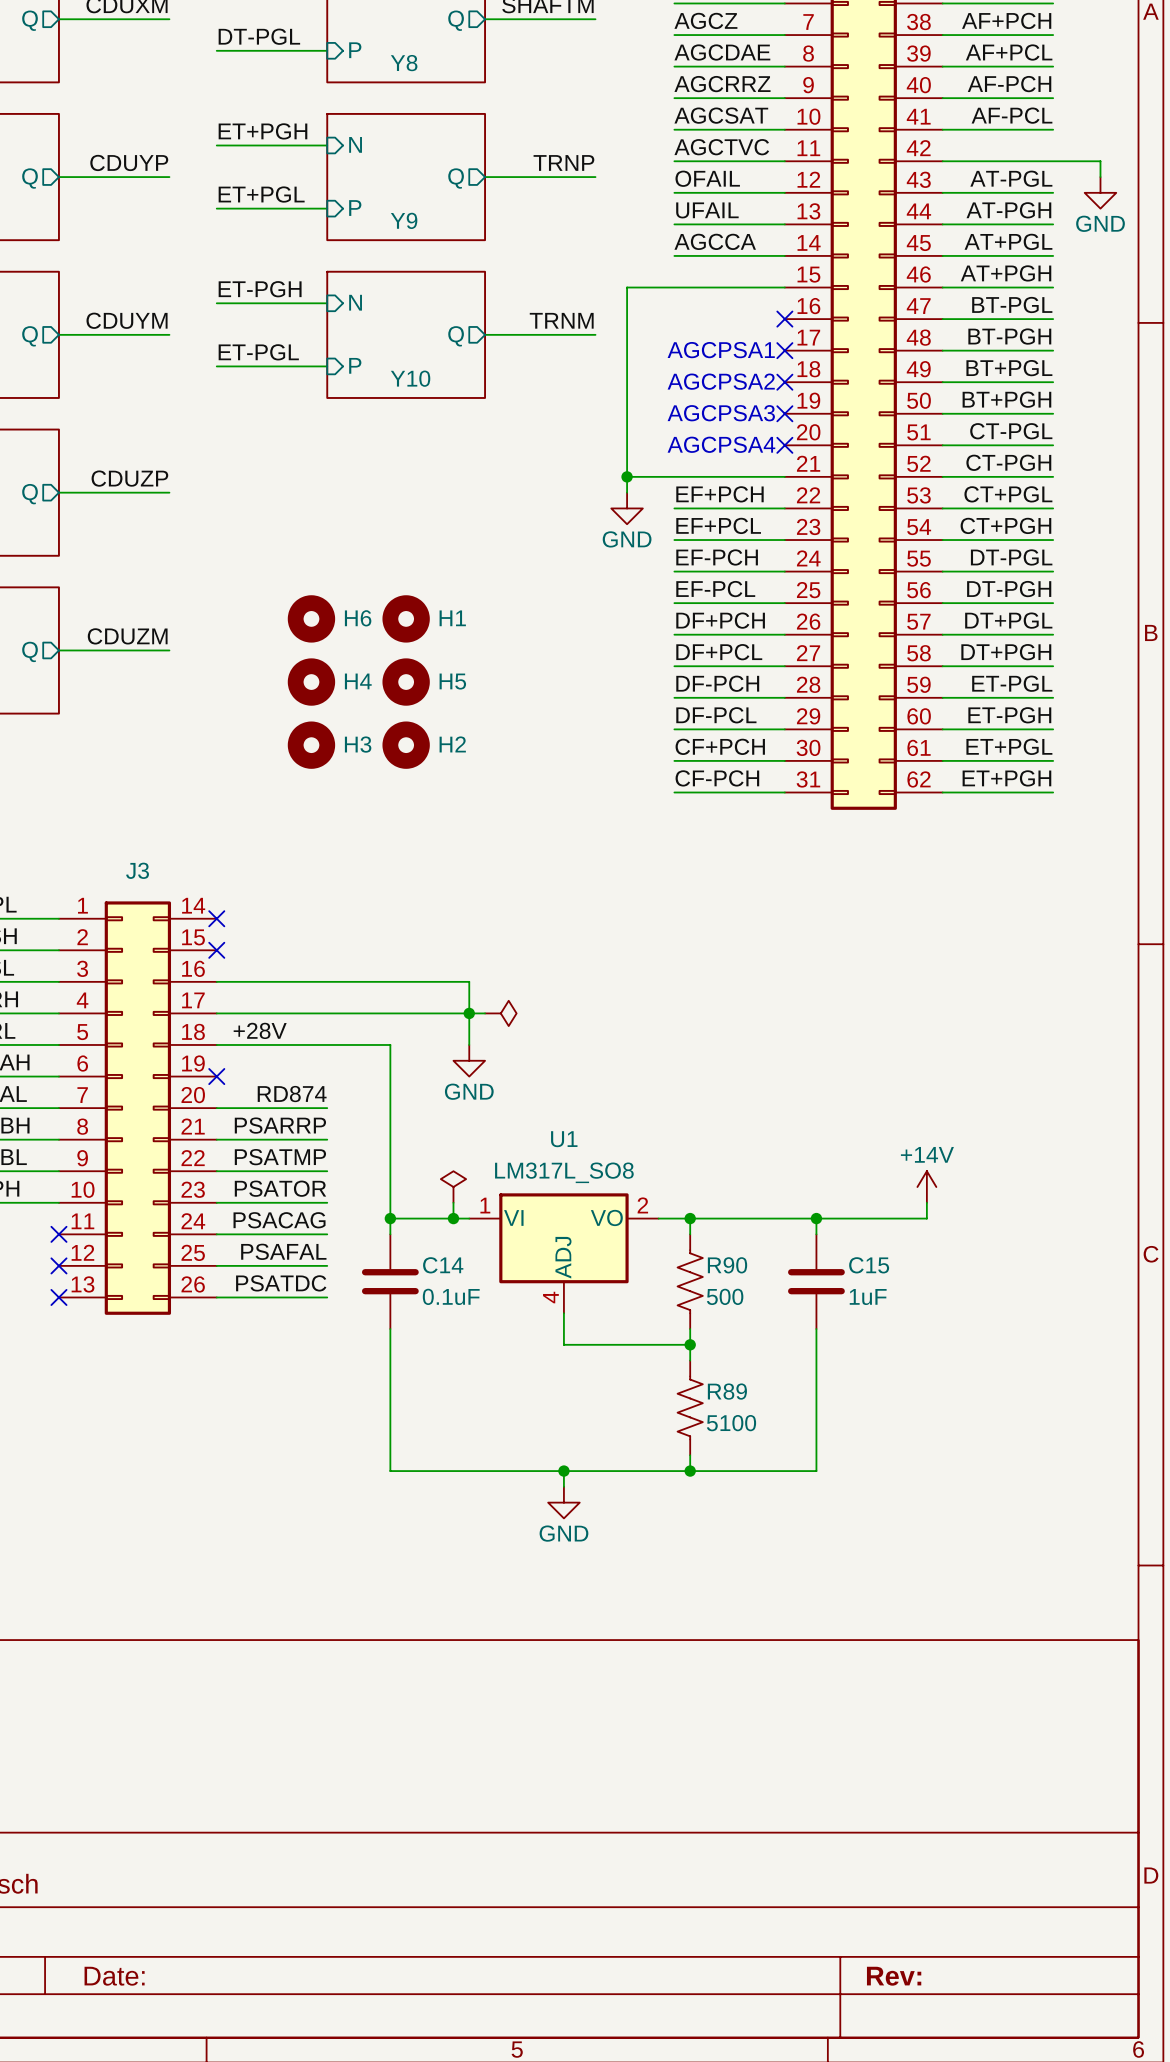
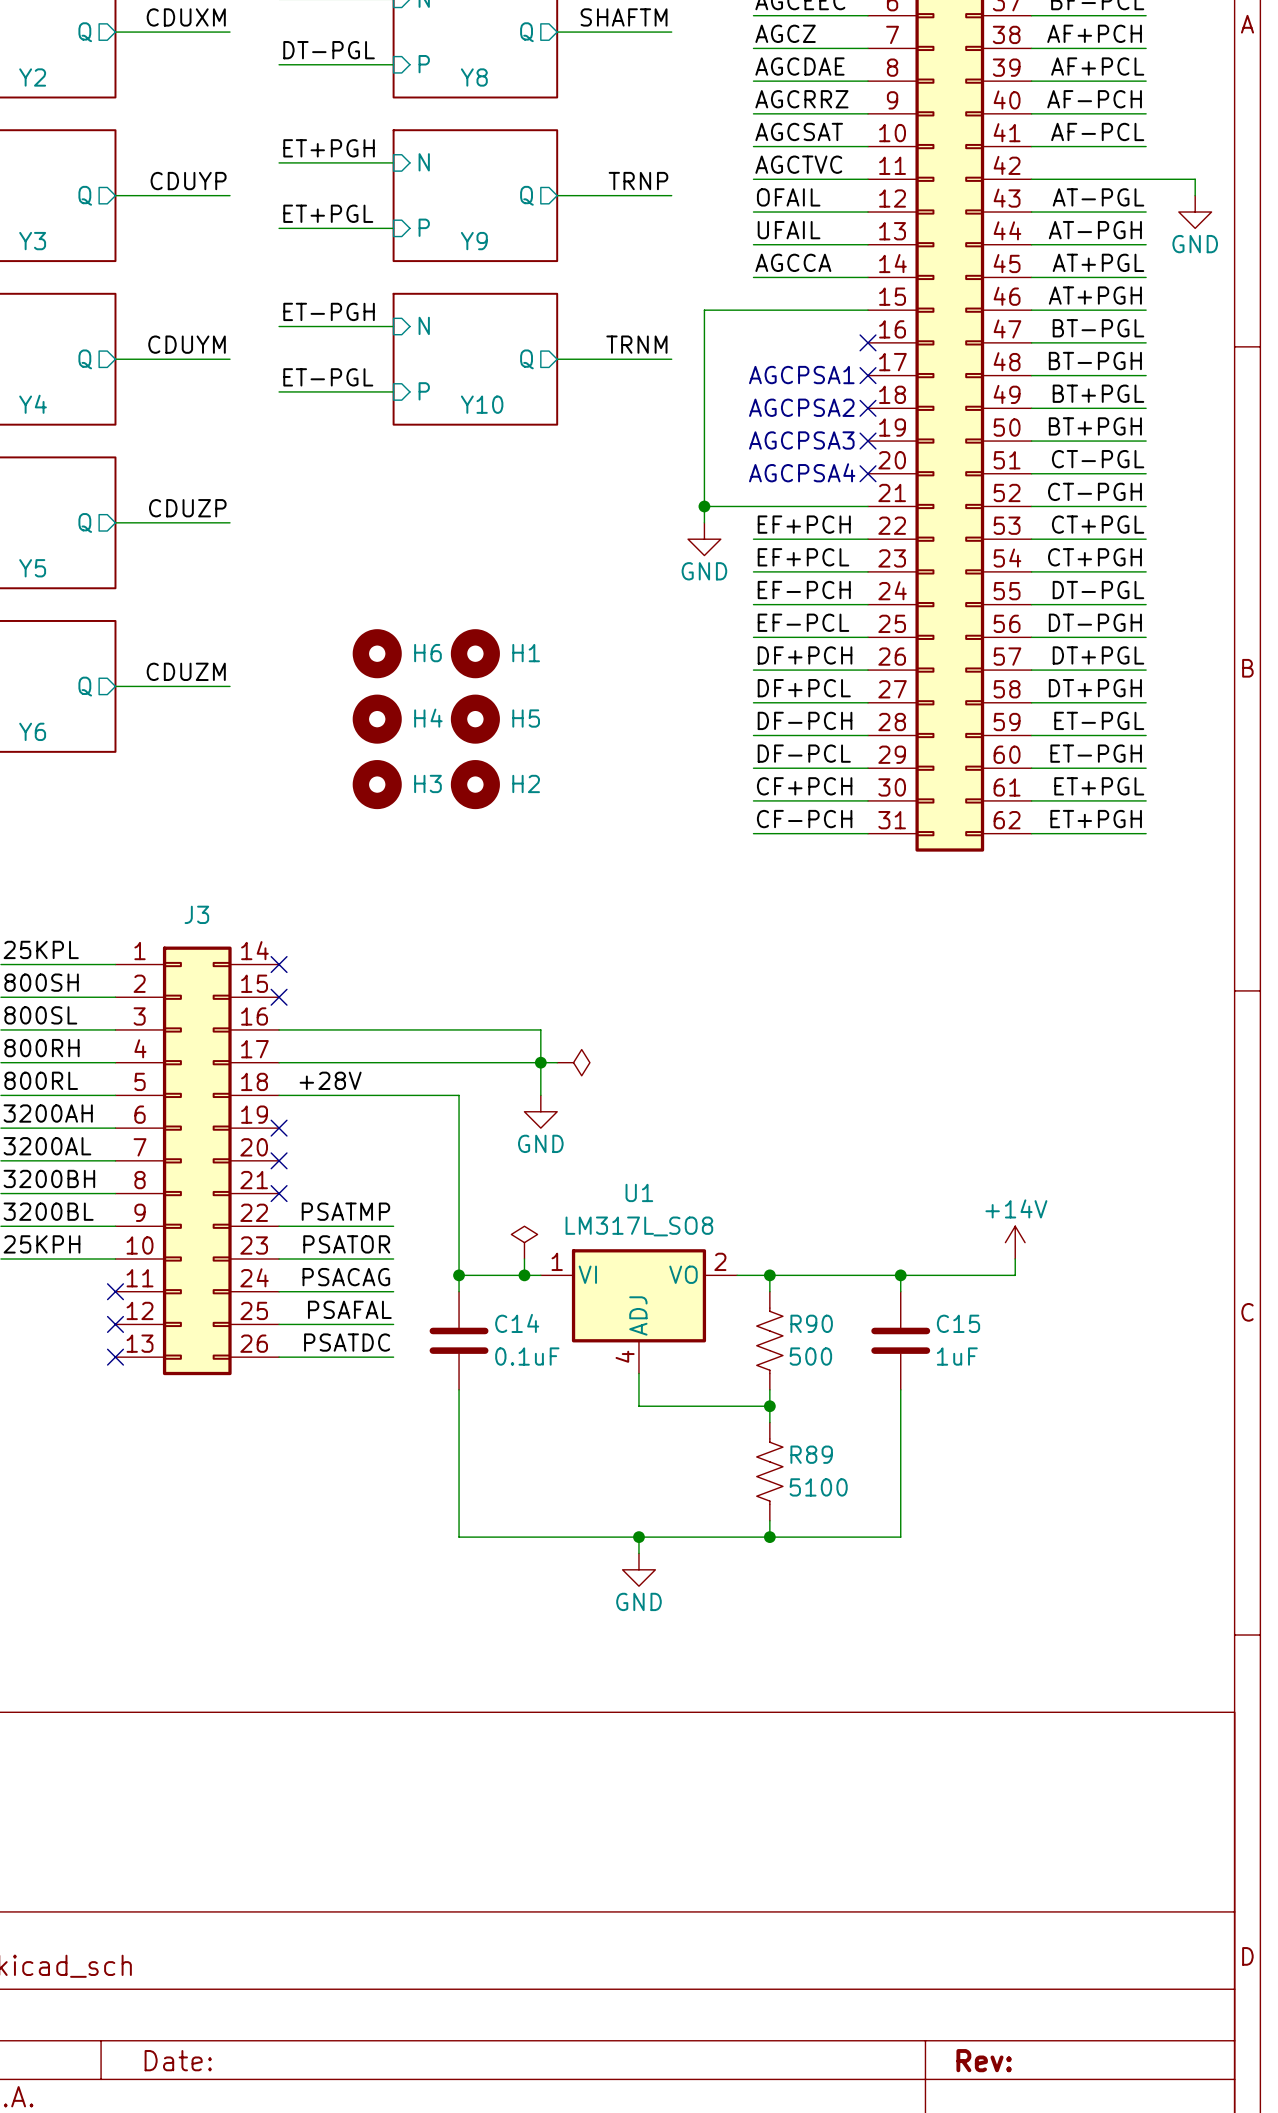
label: RD874 (292, 1094) -> none
wire: (216, 1108) (327, 1108) -> none
no-connect mark: none -> (279, 1160)
label: PSARRP (280, 1125) -> none
wire: (216, 1139) (327, 1139) -> none
no-connect mark: none -> (279, 1193)

